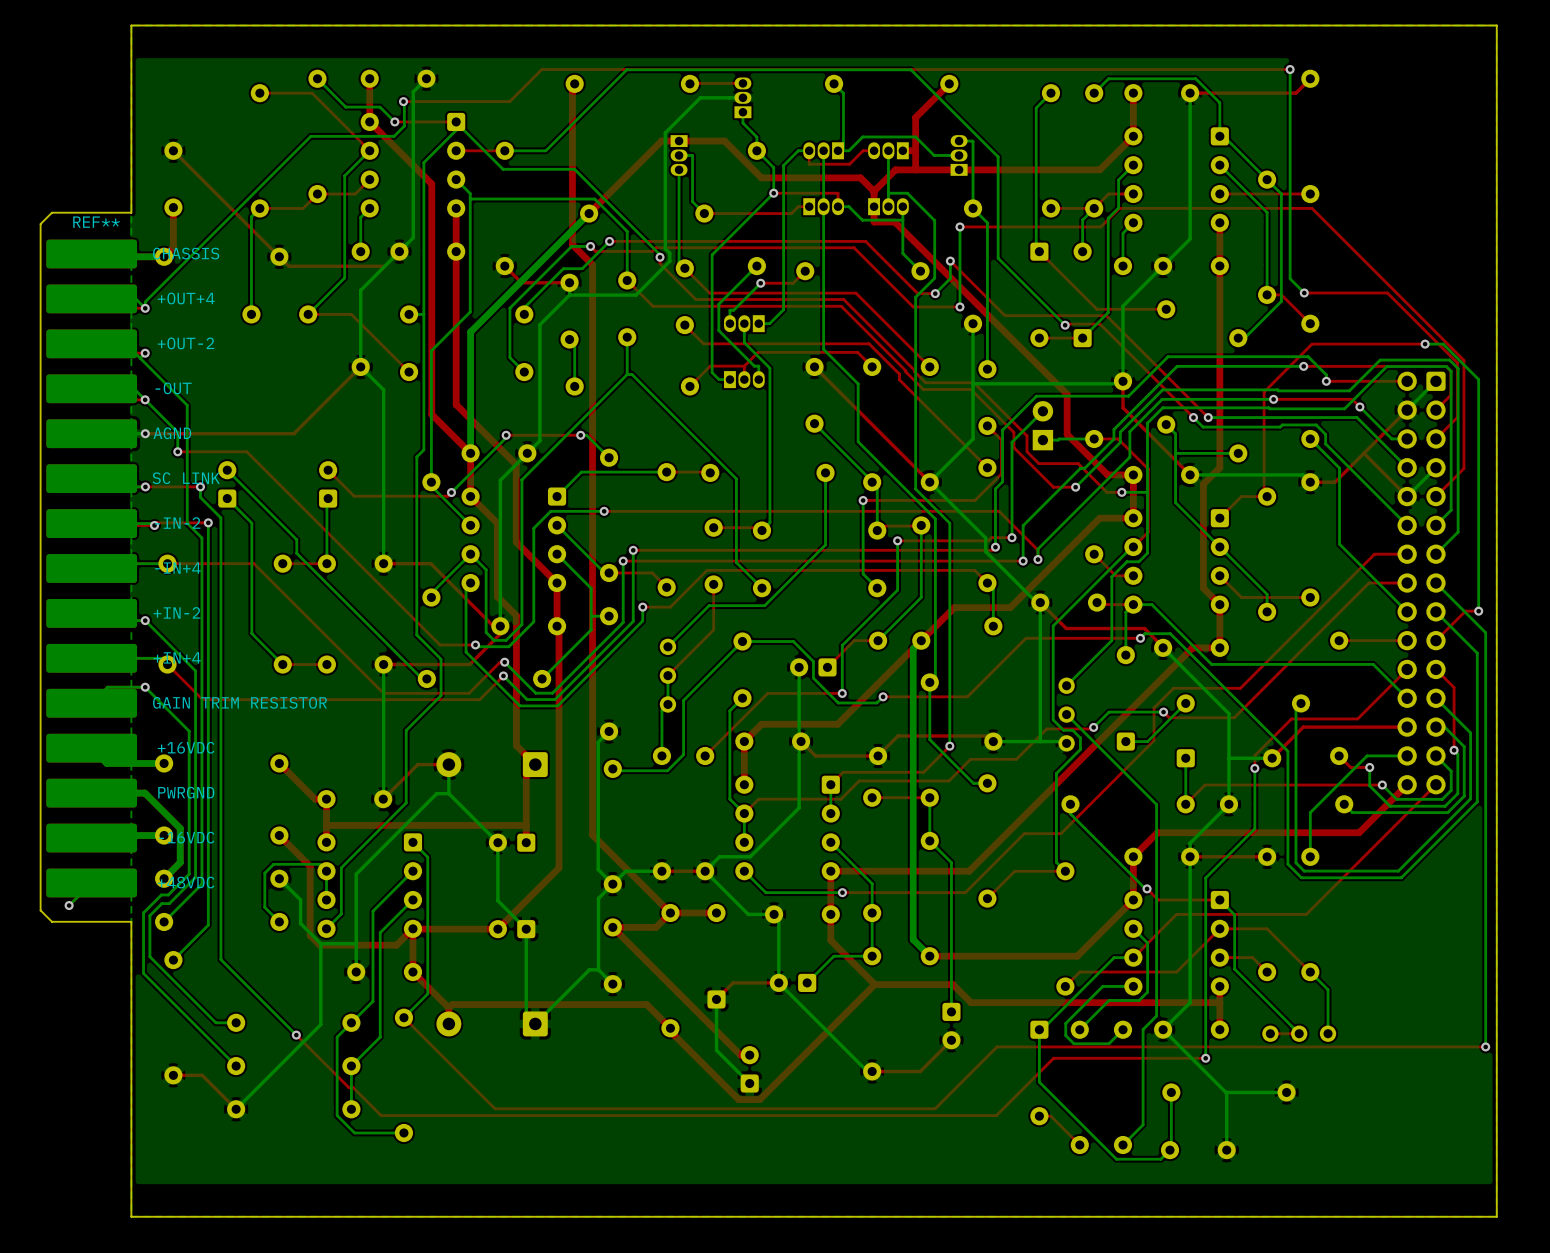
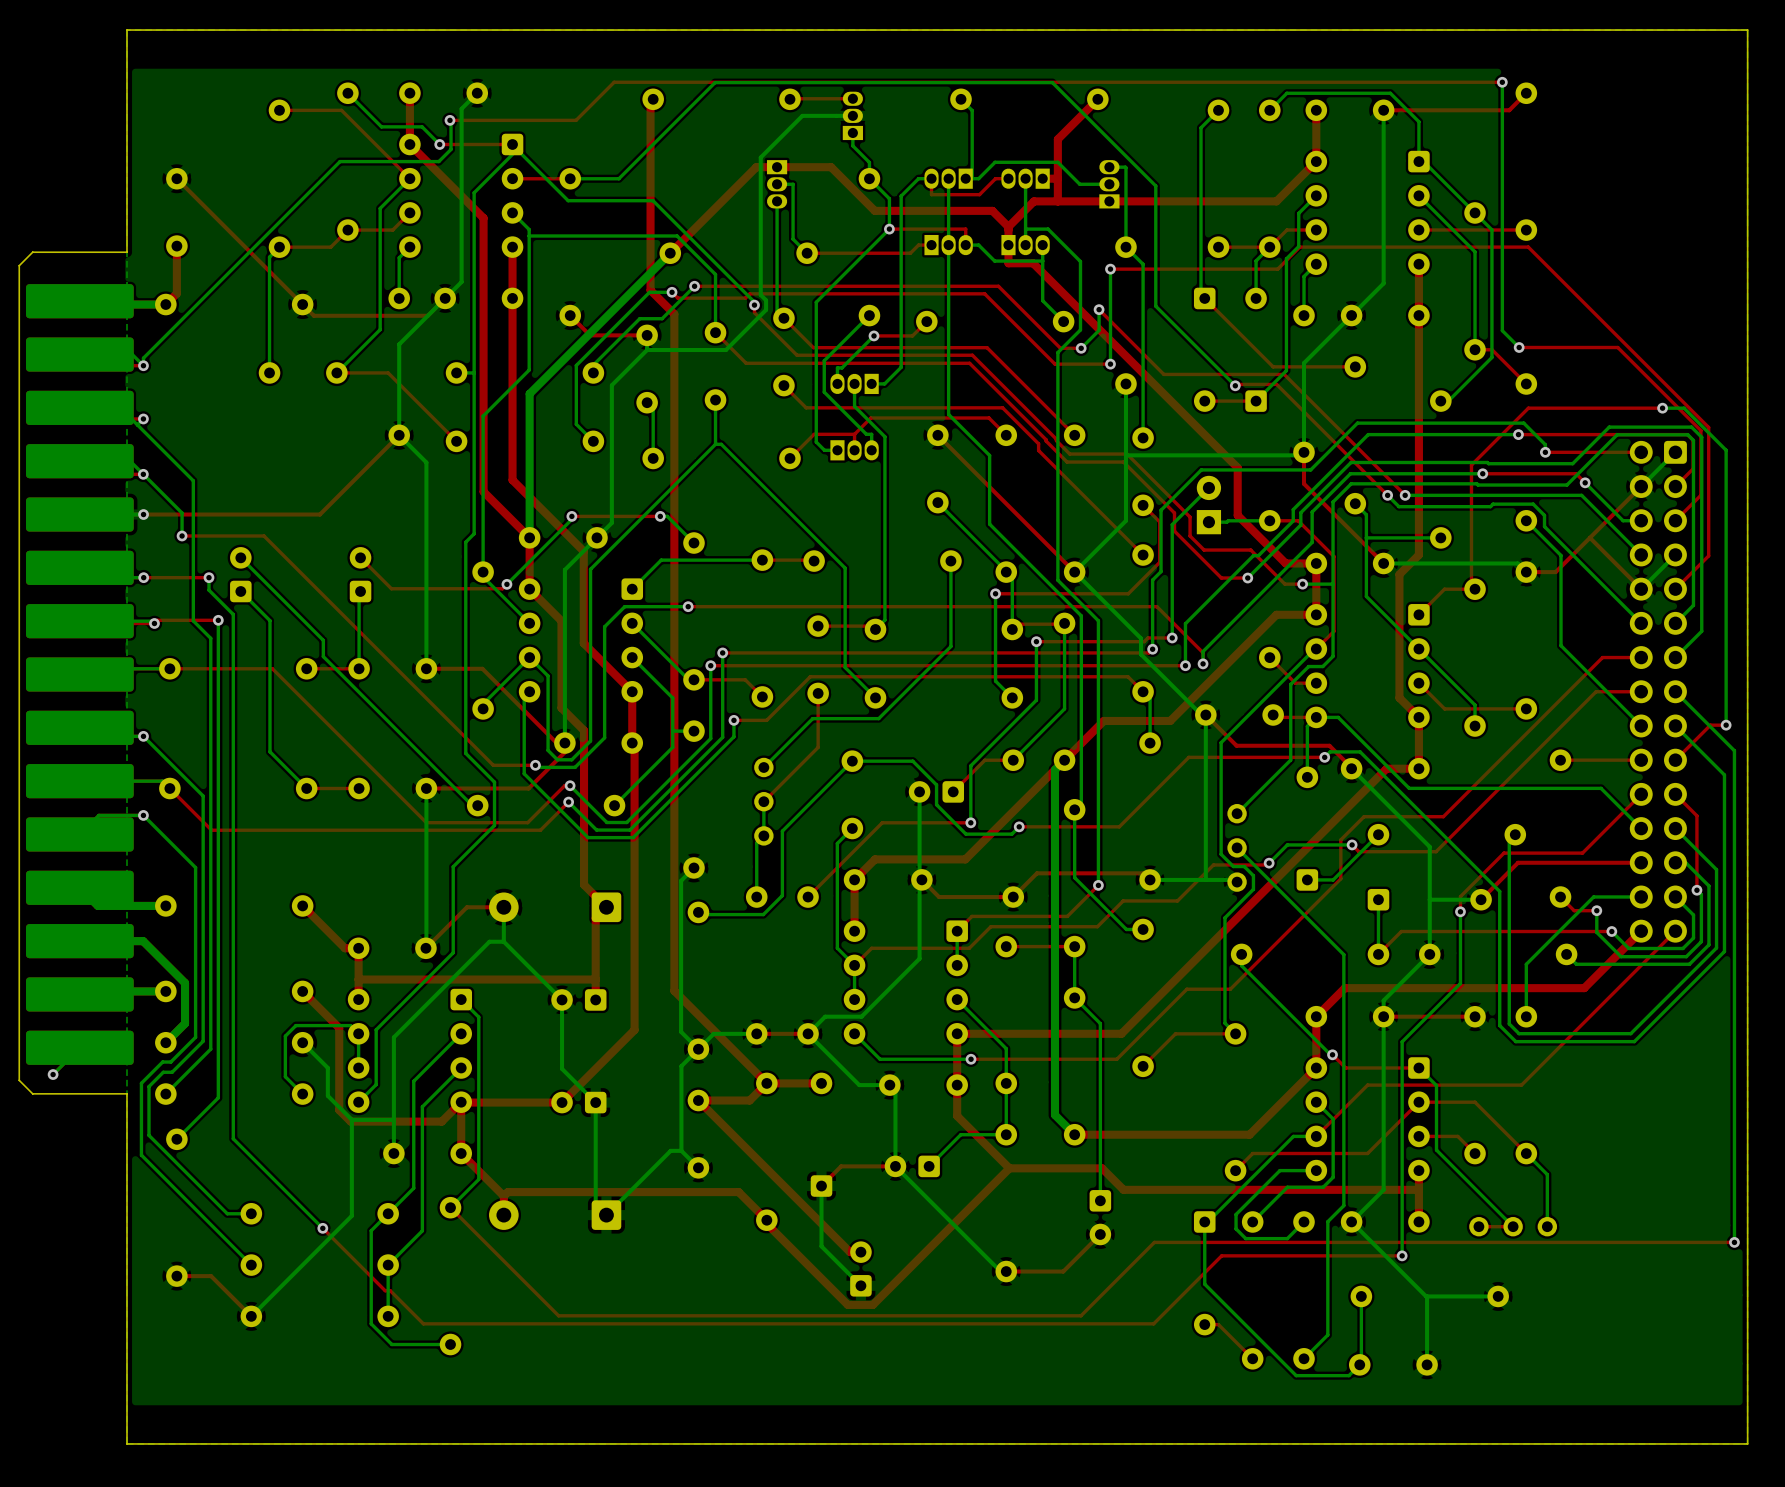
part footprint: [46, 239, 138, 898] -> [26, 284, 134, 1065]

